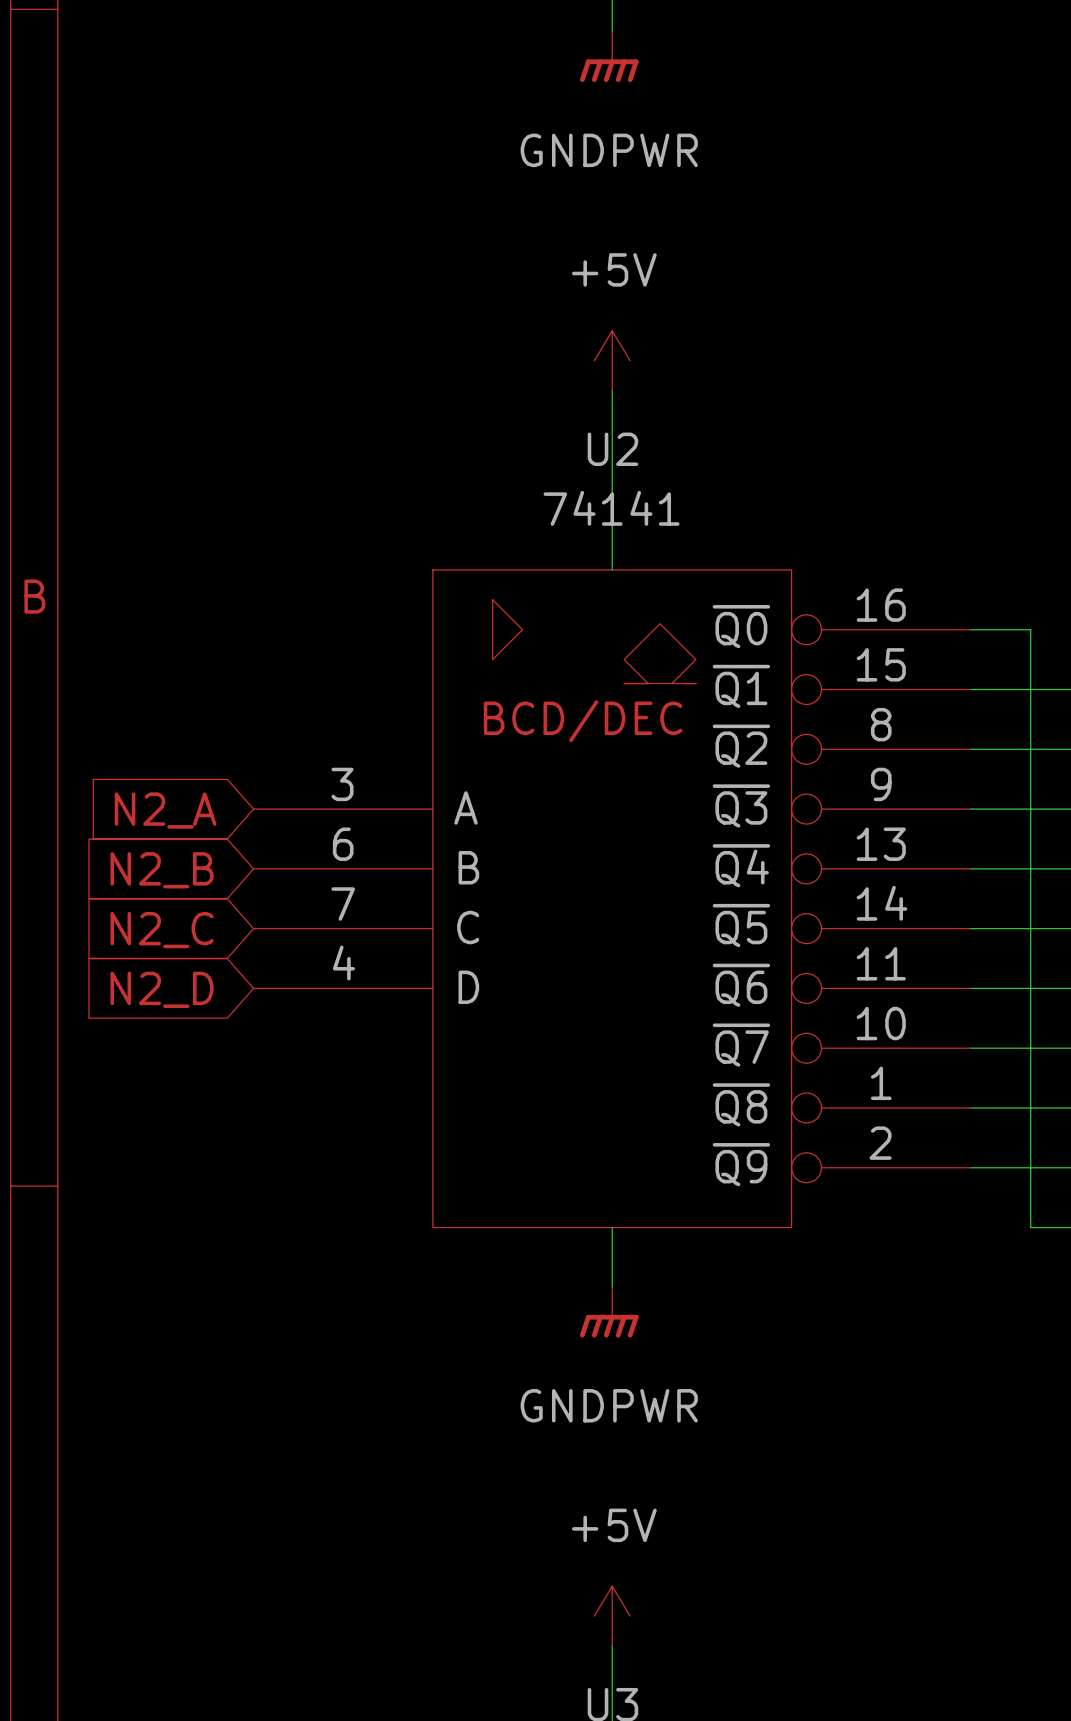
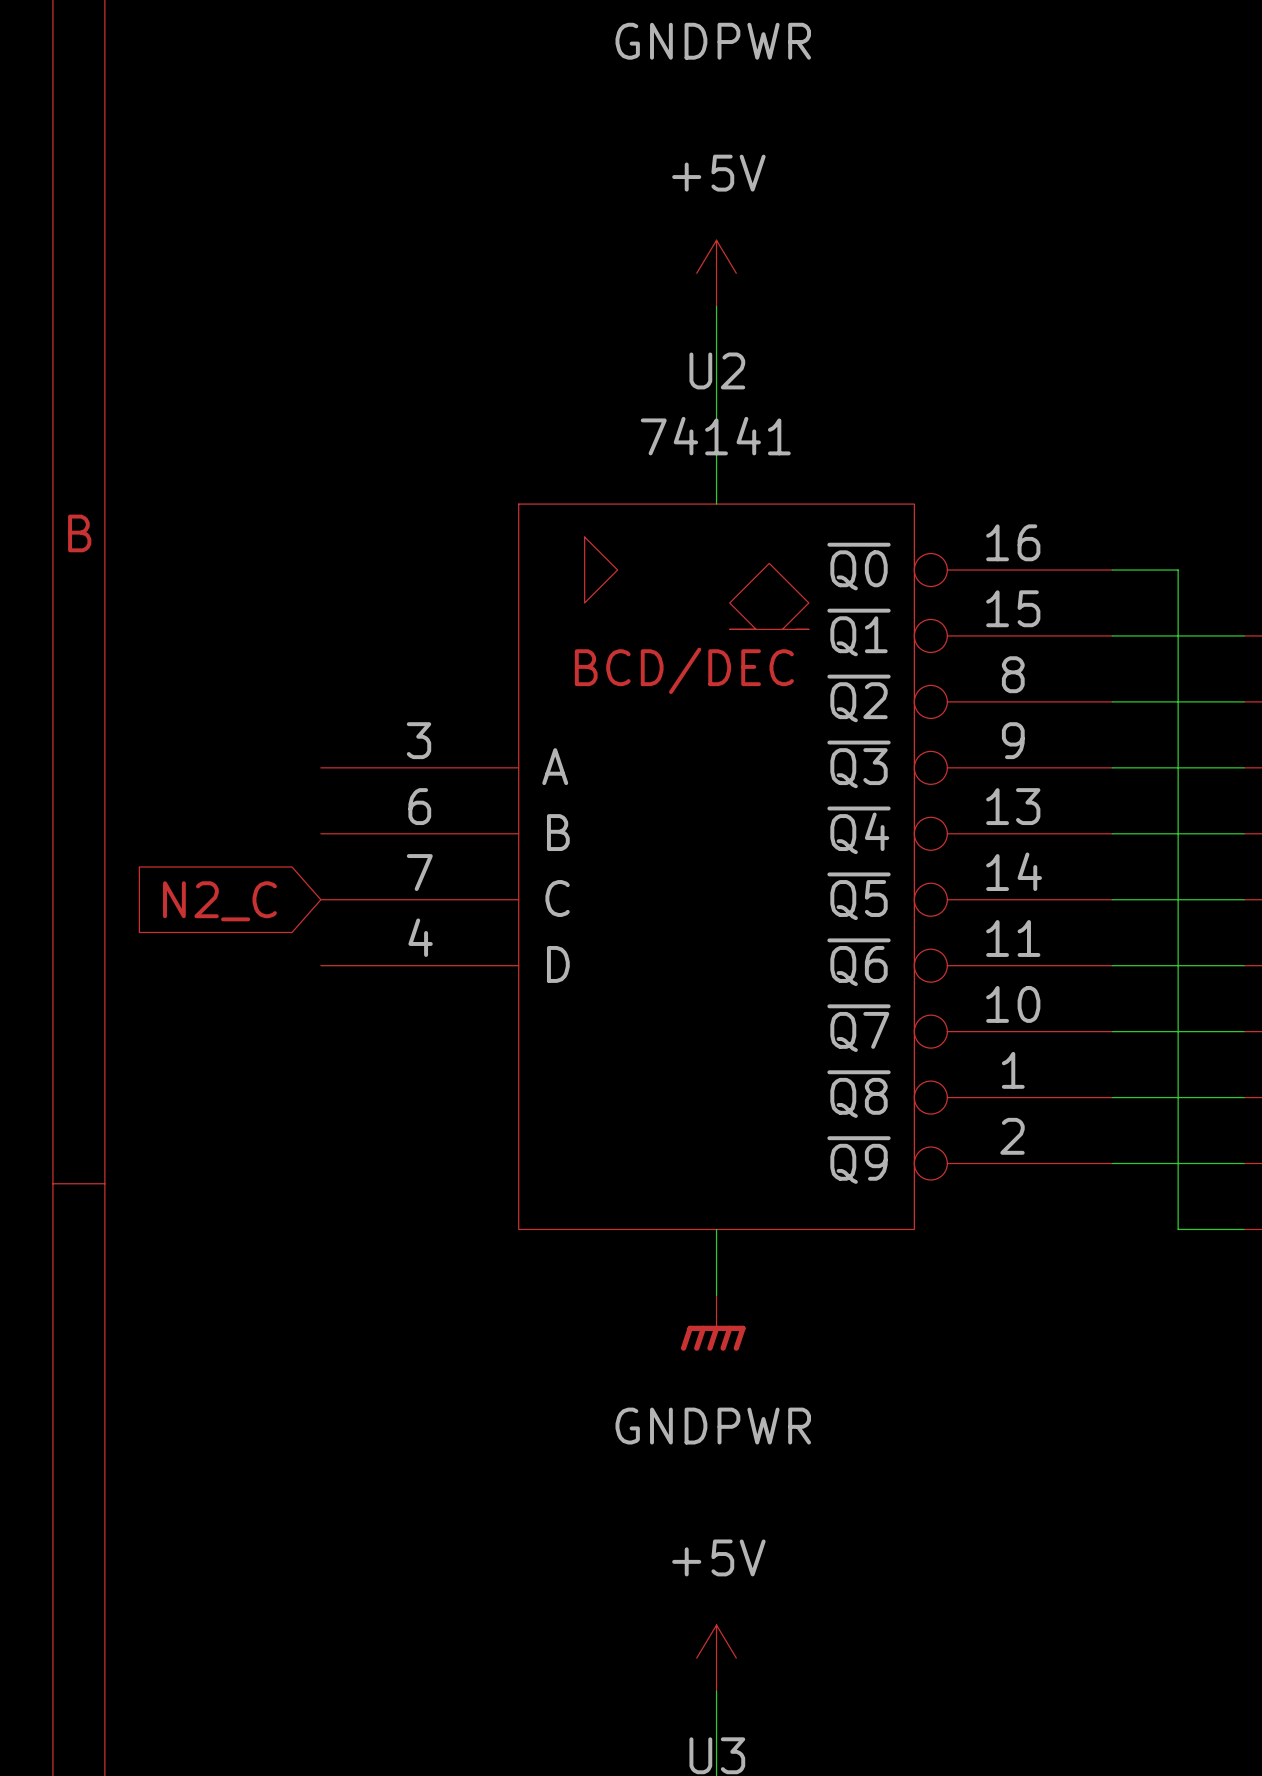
global label: N2_A (165, 810) -> none
global label: N2_B (162, 870) -> none
global label: N2_D (162, 989) -> none

